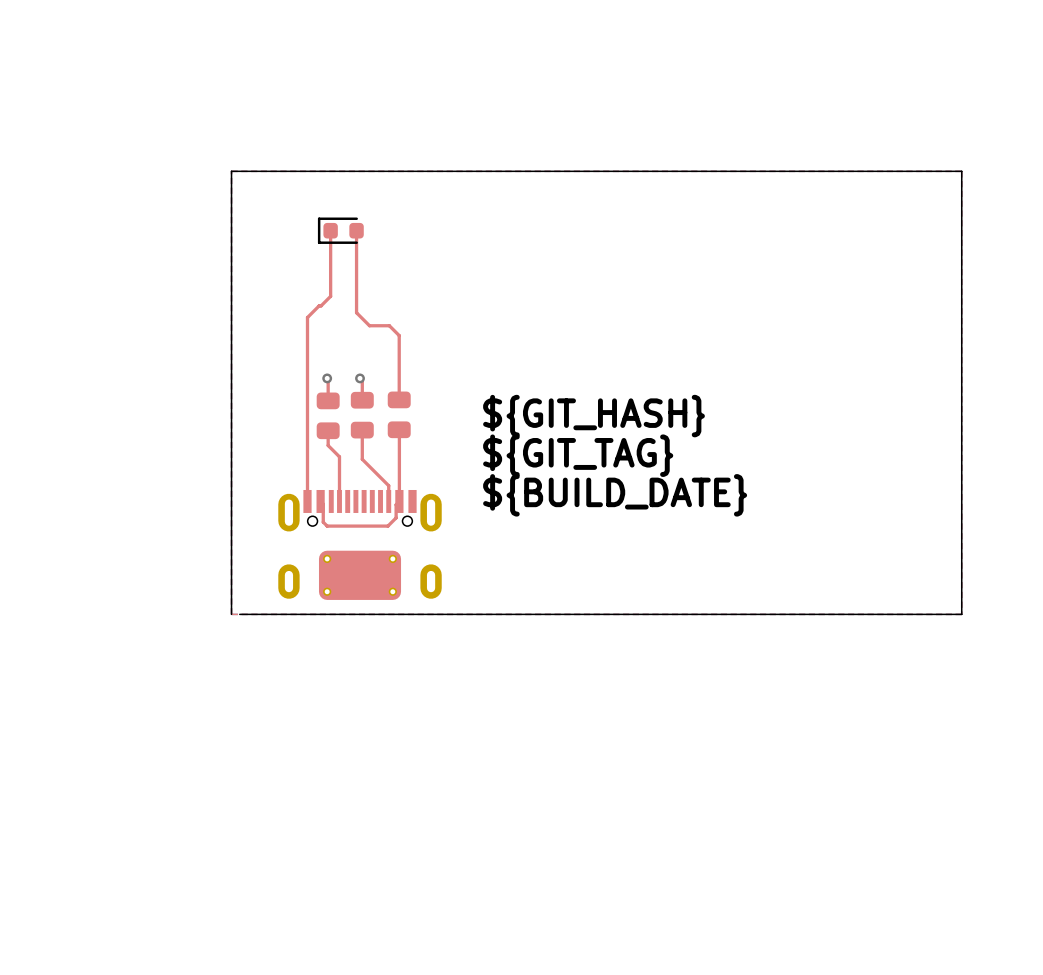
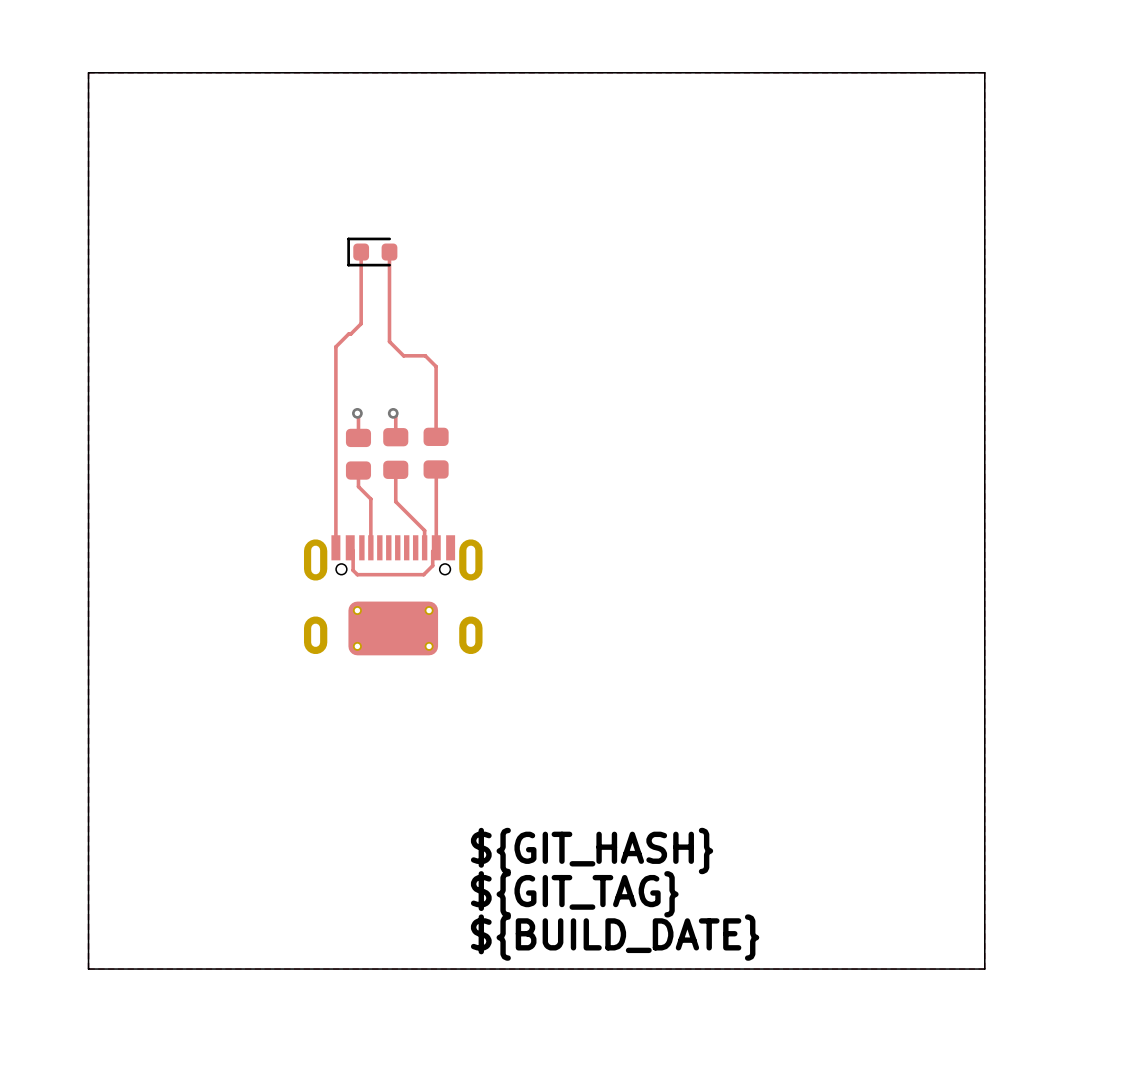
board edge: none -> (88, 72) (984, 72) (984, 969) (88, 969) (88, 72)
text position: ${GIT_HASH} (594, 416) -> ${GIT_HASH} (592, 850)
text position: ${GIT_TAG} (578, 455) -> ${GIT_TAG} (574, 894)
text position: ${BUILD_DATE} (615, 495) -> ${BUILD_DATE} (615, 937)
board edge: (231, 614) (231, 171) (961, 171) (961, 614) (239, 614) -> none

